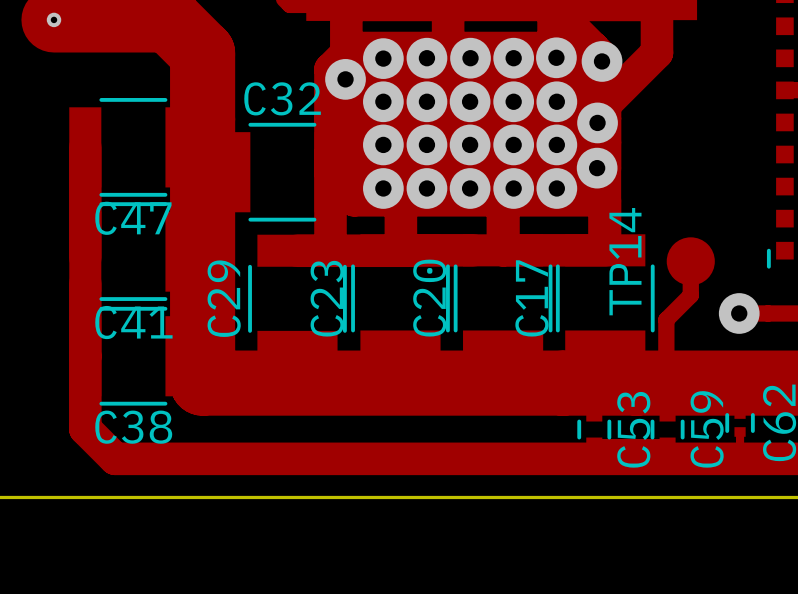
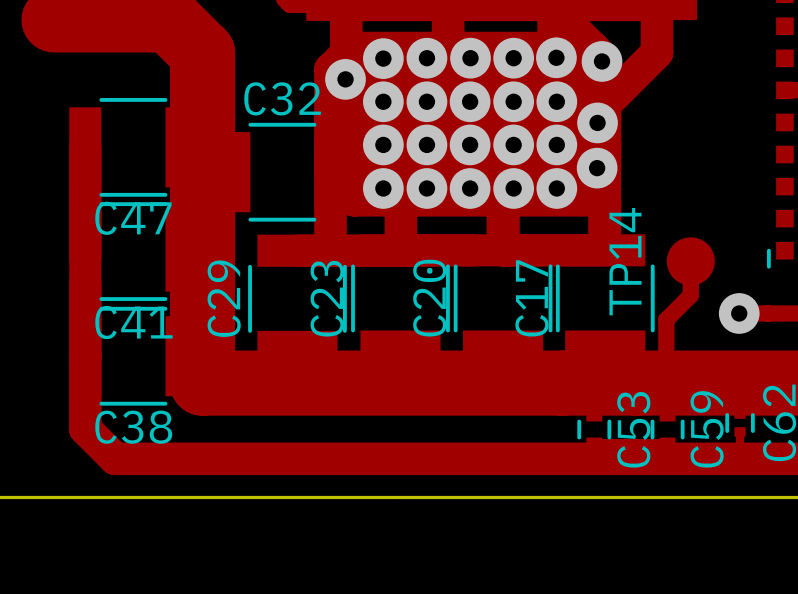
via: (53, 19) -> none

